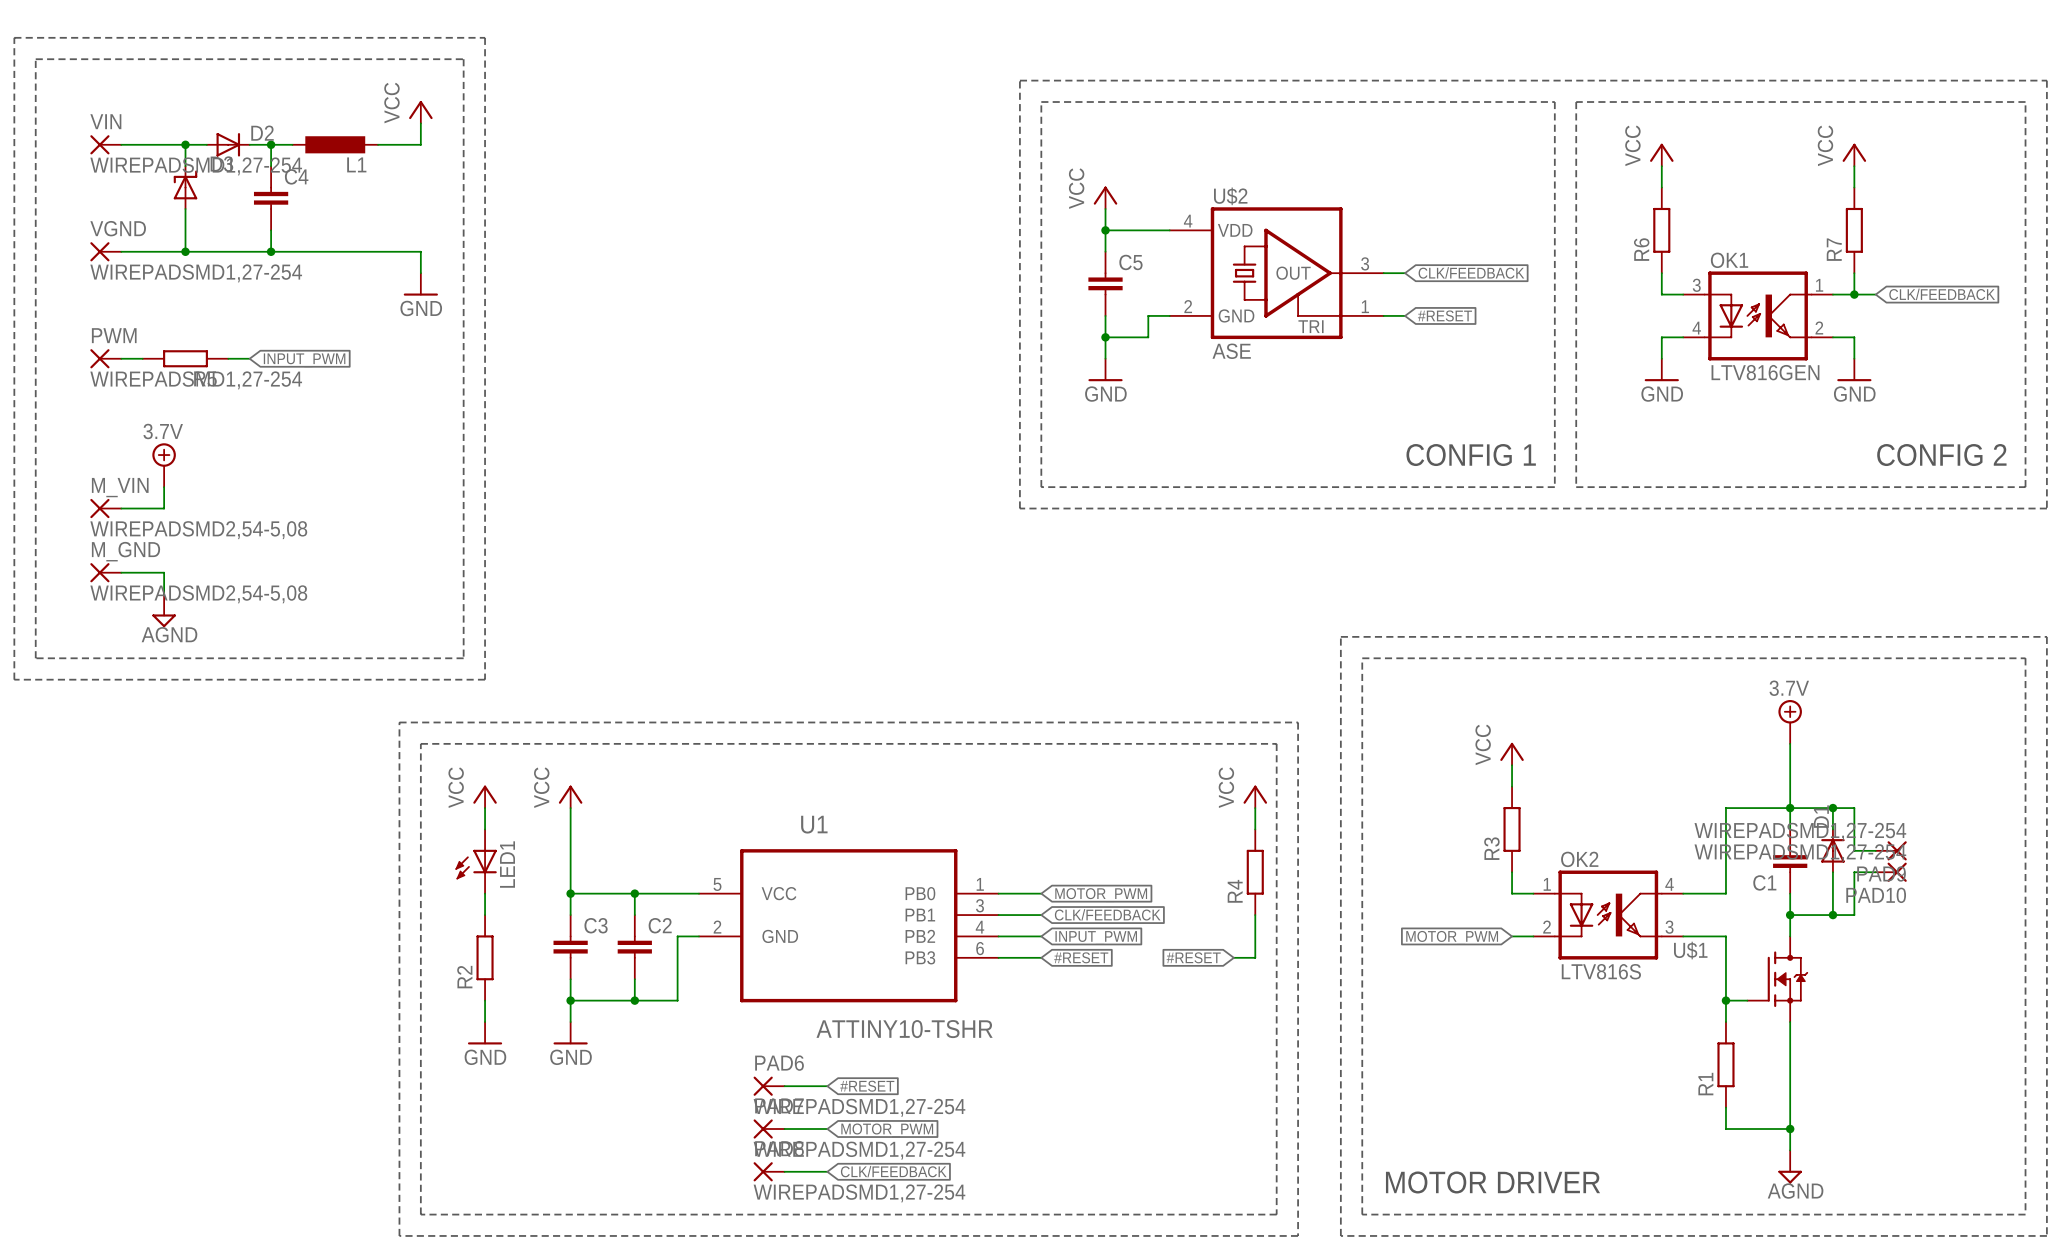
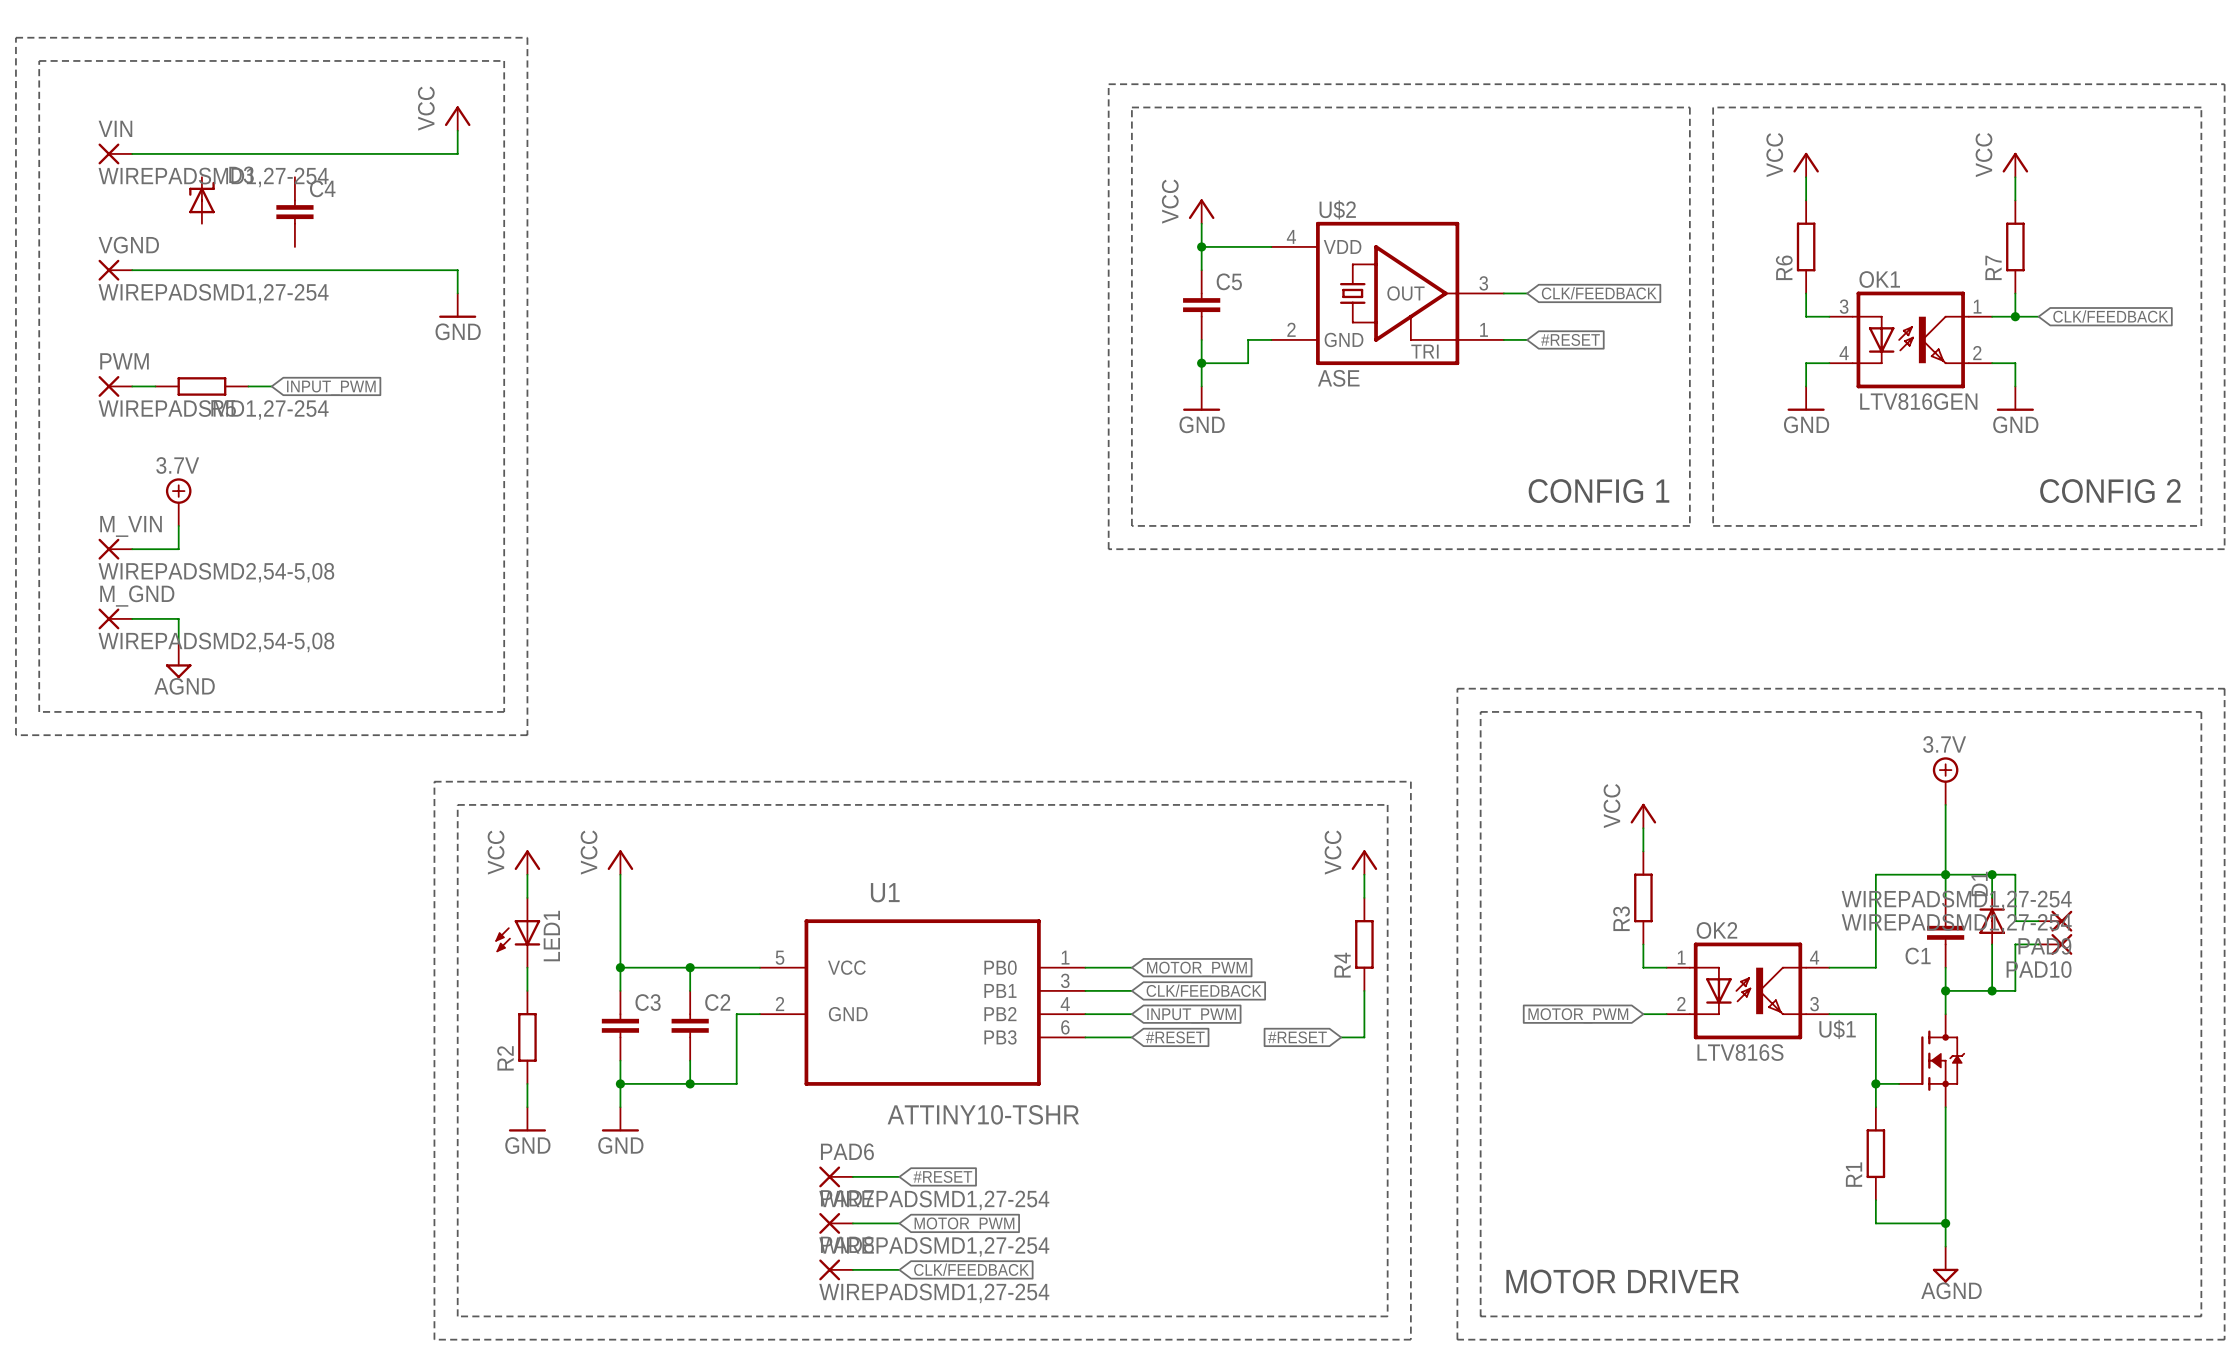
wire: (185, 144) (185, 166) -> none
junction: (185, 144) -> none
D2: (228, 144) -> none
wire: (271, 144) (271, 166) -> none
junction: (271, 144) -> none
L1: (335, 144) -> none
wire: (185, 208) (185, 251) -> none
wire: (271, 230) (271, 251) -> none
junction: (185, 251) -> none
junction: (271, 251) -> none

